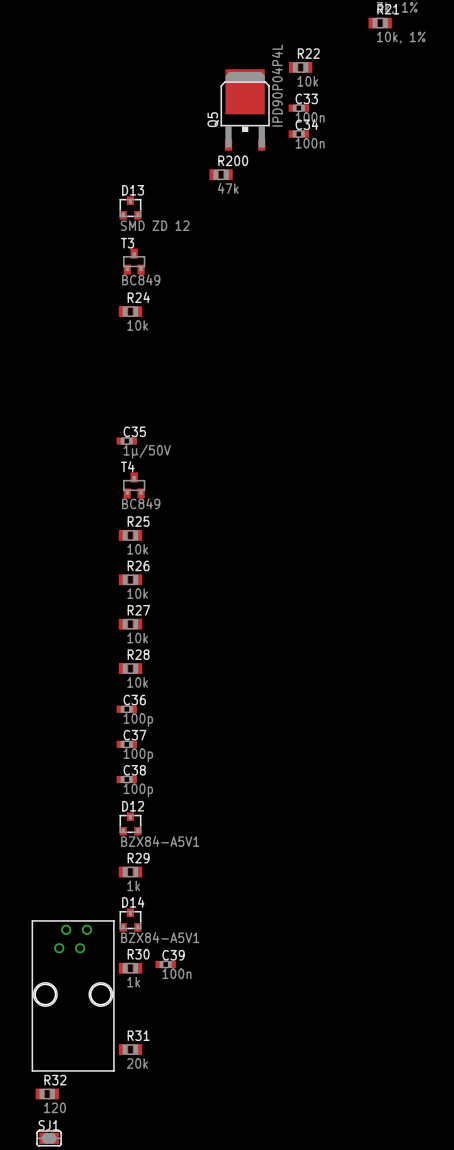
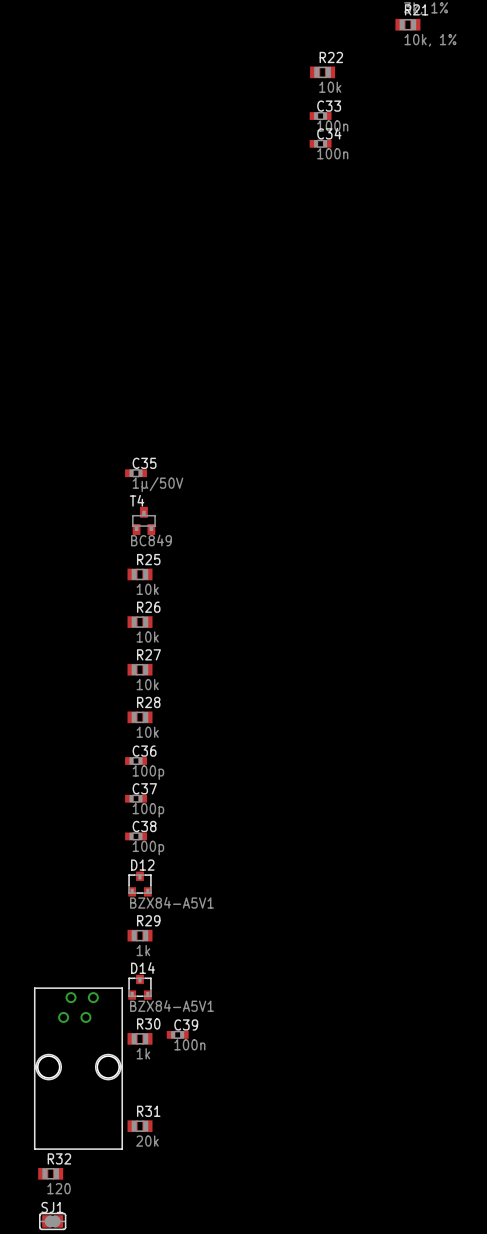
Q5: IPD90P04P4L (245, 109) -> none
R200: 47k (221, 174) -> none
D13: SMD ZD 12 (130, 208) -> none
T3: BC849 (134, 261) -> none
R24: 10k (130, 311) -> none

